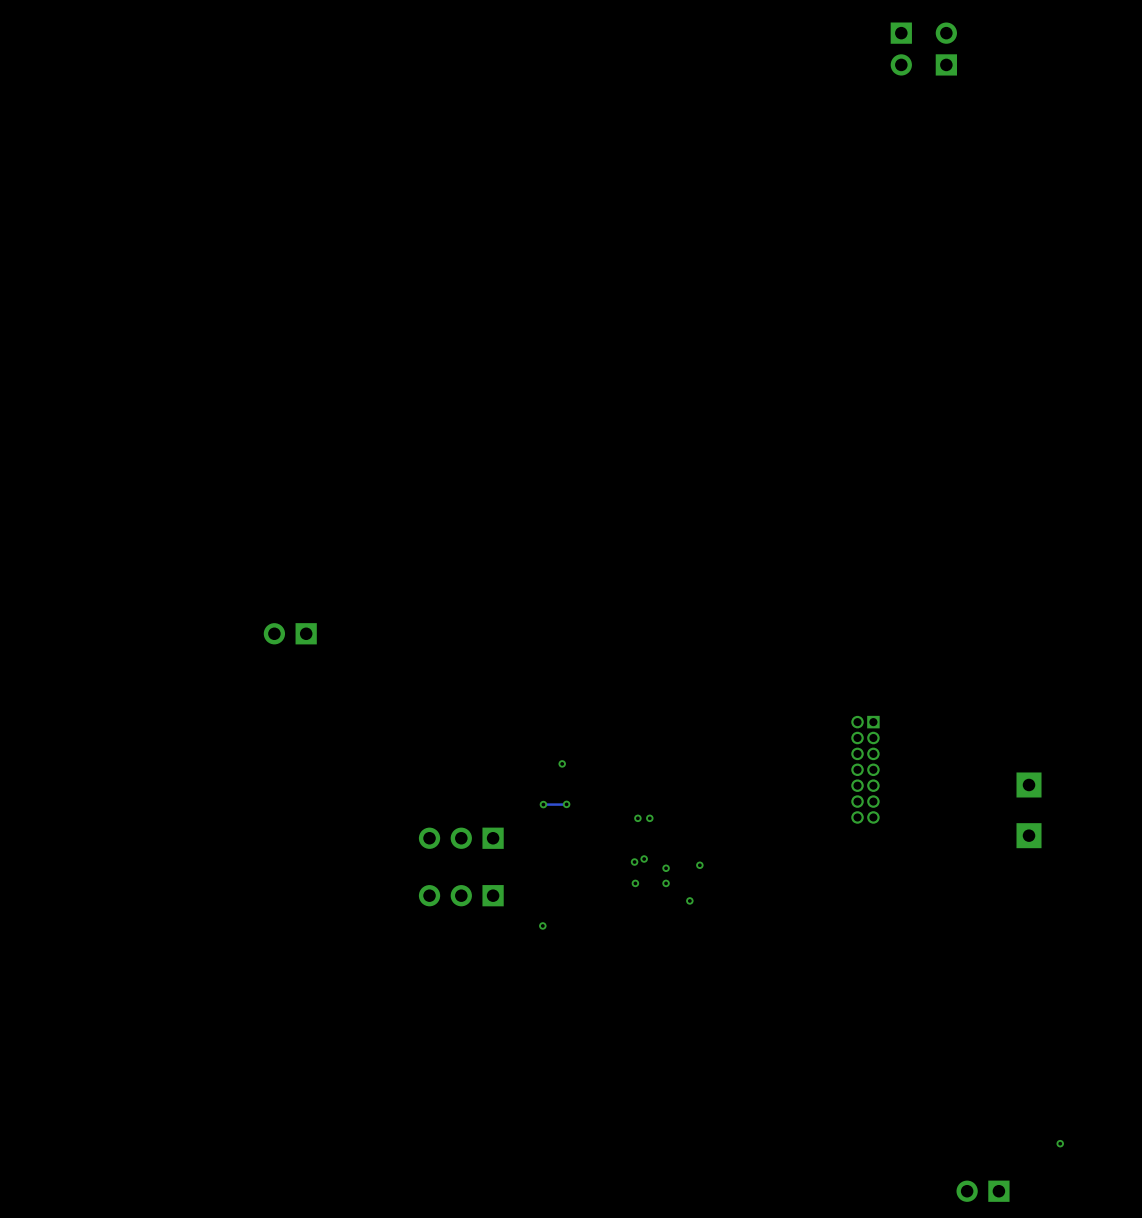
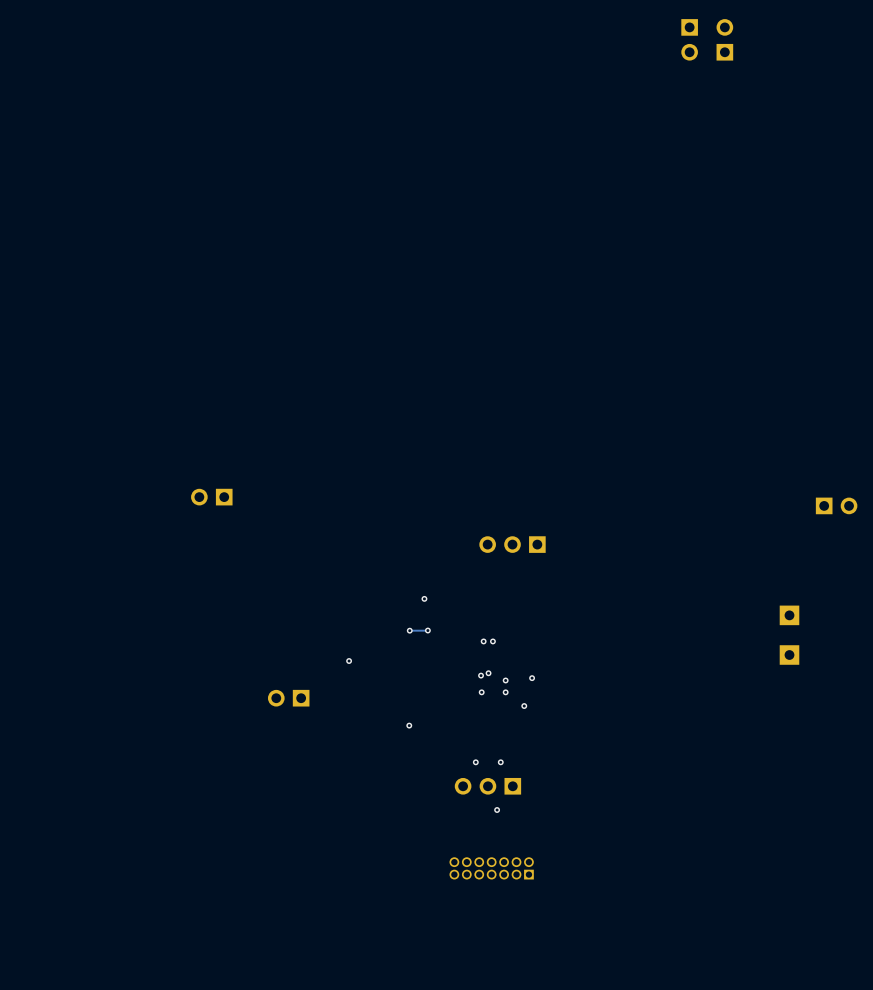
part: none -> (836, 505)
part: none -> (512, 544)
part: (865, 769) -> none
part: (461, 838) -> none
via: none -> (349, 661)
part: none -> (288, 698)
part: (461, 895) -> none
via: none -> (475, 762)
via: none -> (500, 762)
part: none -> (487, 786)
via: none -> (497, 810)
part: none -> (491, 868)
via: (1060, 1143) -> none
part: (983, 1191) -> none

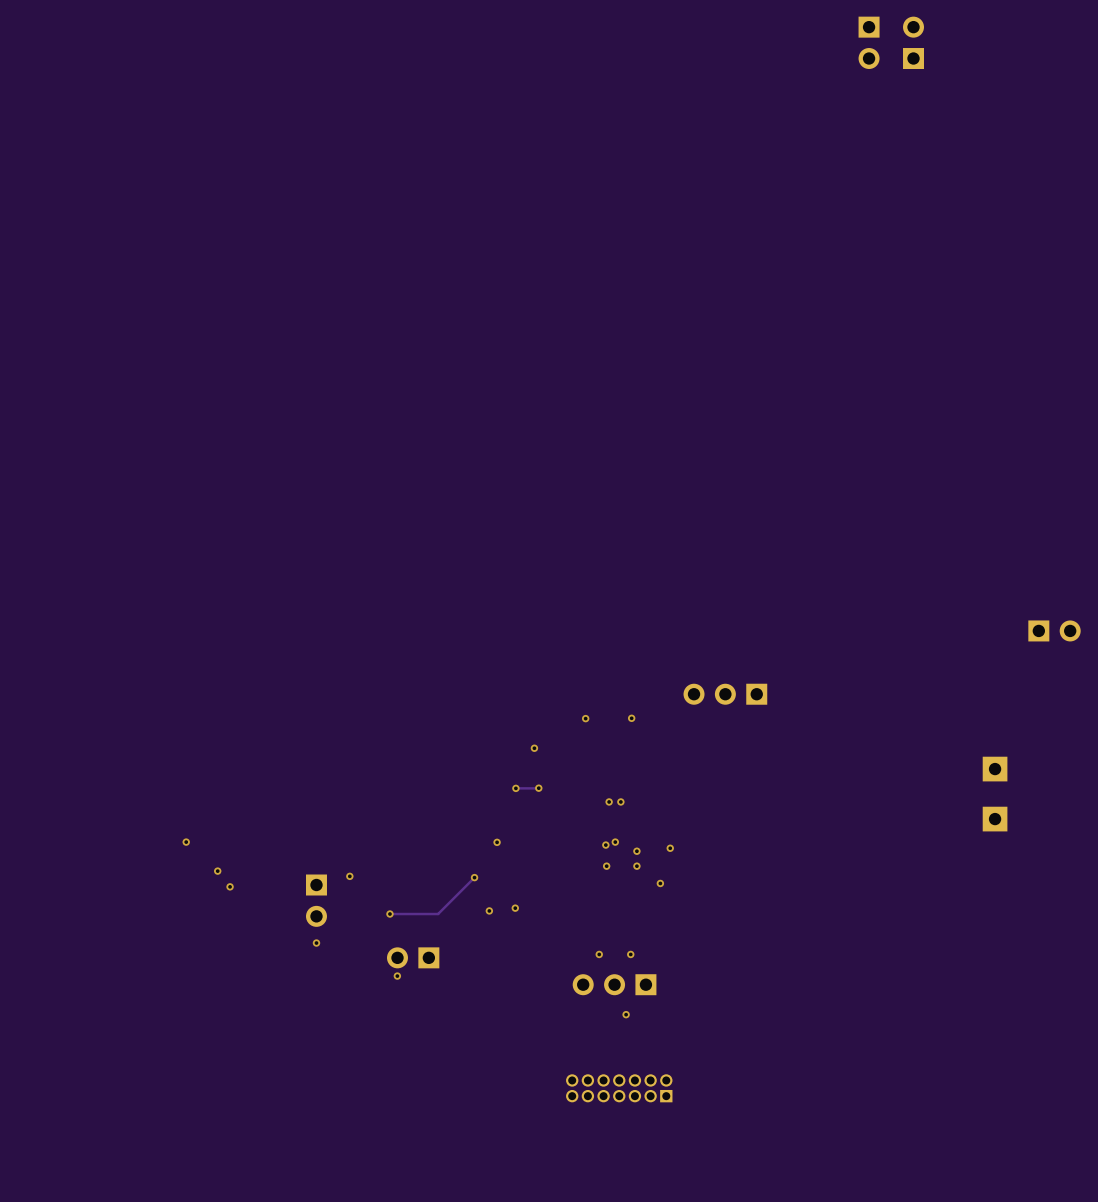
part: (211, 497) -> none
part position: (512, 544) -> (725, 694)
via: none -> (585, 718)
via: none -> (631, 718)
via: (349, 661) -> none
via: none -> (186, 842)
via: none -> (497, 842)
via: none -> (217, 871)
part: (288, 698) -> none
via: none -> (349, 876)
track: none -> (474, 877) (438, 914) (389, 914)
via: none -> (474, 877)
via: none -> (230, 886)
part: none -> (316, 900)
via: none -> (489, 910)
via: none -> (389, 914)
via: none -> (316, 943)
part: none -> (413, 957)
via: none -> (397, 976)

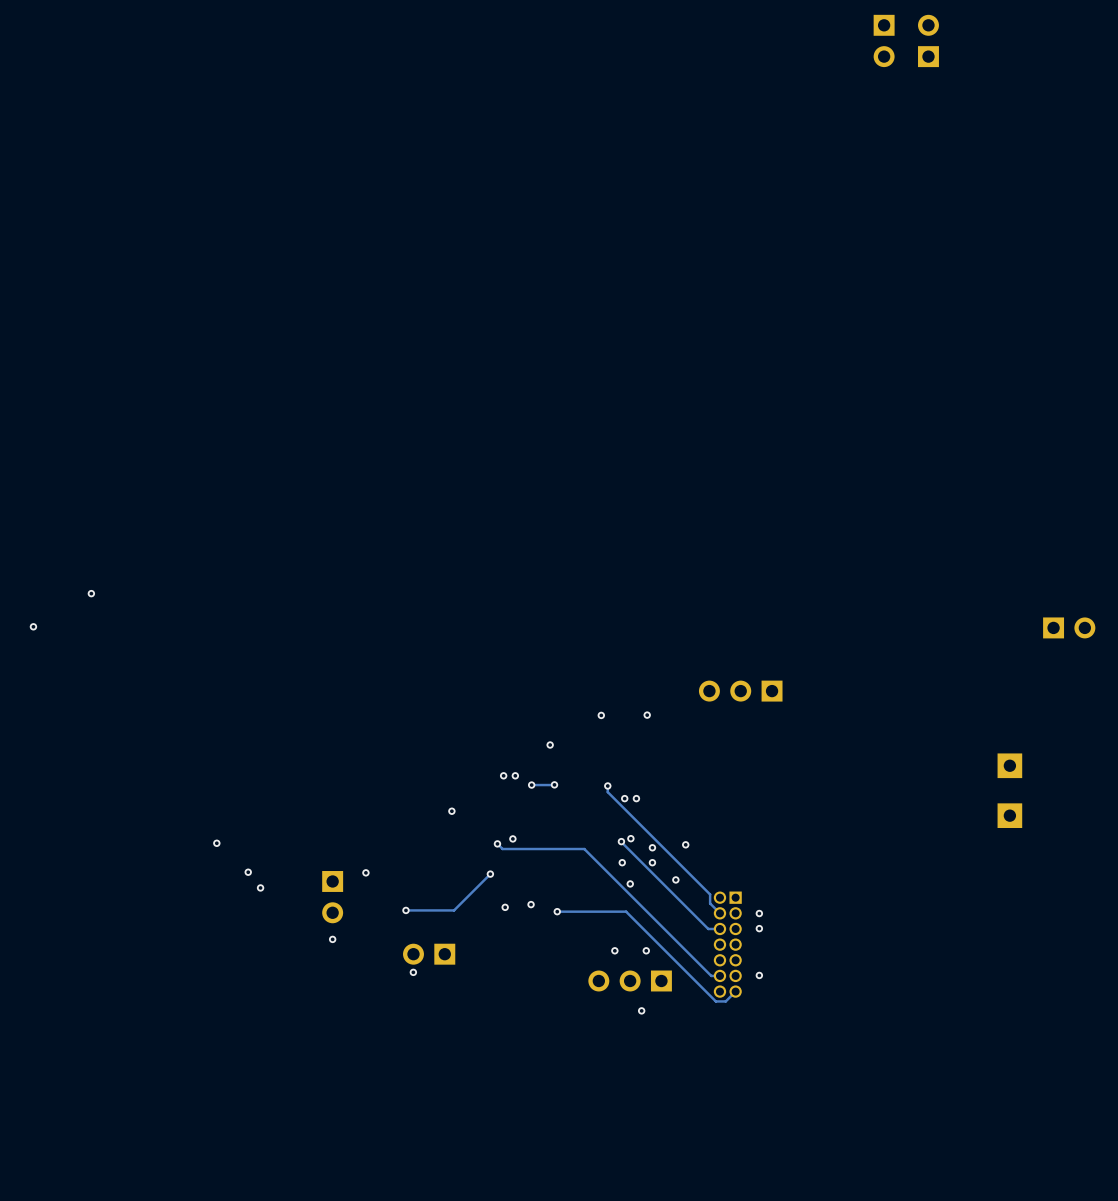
via: none -> (91, 593)
via: none -> (33, 626)
via: none -> (503, 775)
via: none -> (515, 775)
track: none -> (607, 785) (607, 792) (710, 894) (710, 903) (719, 913)
via: none -> (607, 785)
via: none -> (451, 811)
via: (186, 842) -> none
track: none -> (621, 841) (708, 928) (719, 928)
via: none -> (216, 843)
track: none -> (497, 843) (502, 849) (584, 849) (711, 975) (719, 975)
via: none -> (497, 843)
via: (217, 871) -> none
via: none -> (248, 872)
via: (230, 886) -> none
via: none -> (630, 883)
via: none -> (260, 887)
track: none -> (557, 911) (626, 911) (715, 1001) (725, 1001) (735, 991)
via: none -> (557, 911)
via: none -> (759, 913)
via: none -> (759, 928)
via: none -> (759, 975)
part rotation: 0° (619, 1088) -> 90° counterclockwise (727, 944)
part position: (619, 1088) -> (727, 944)

